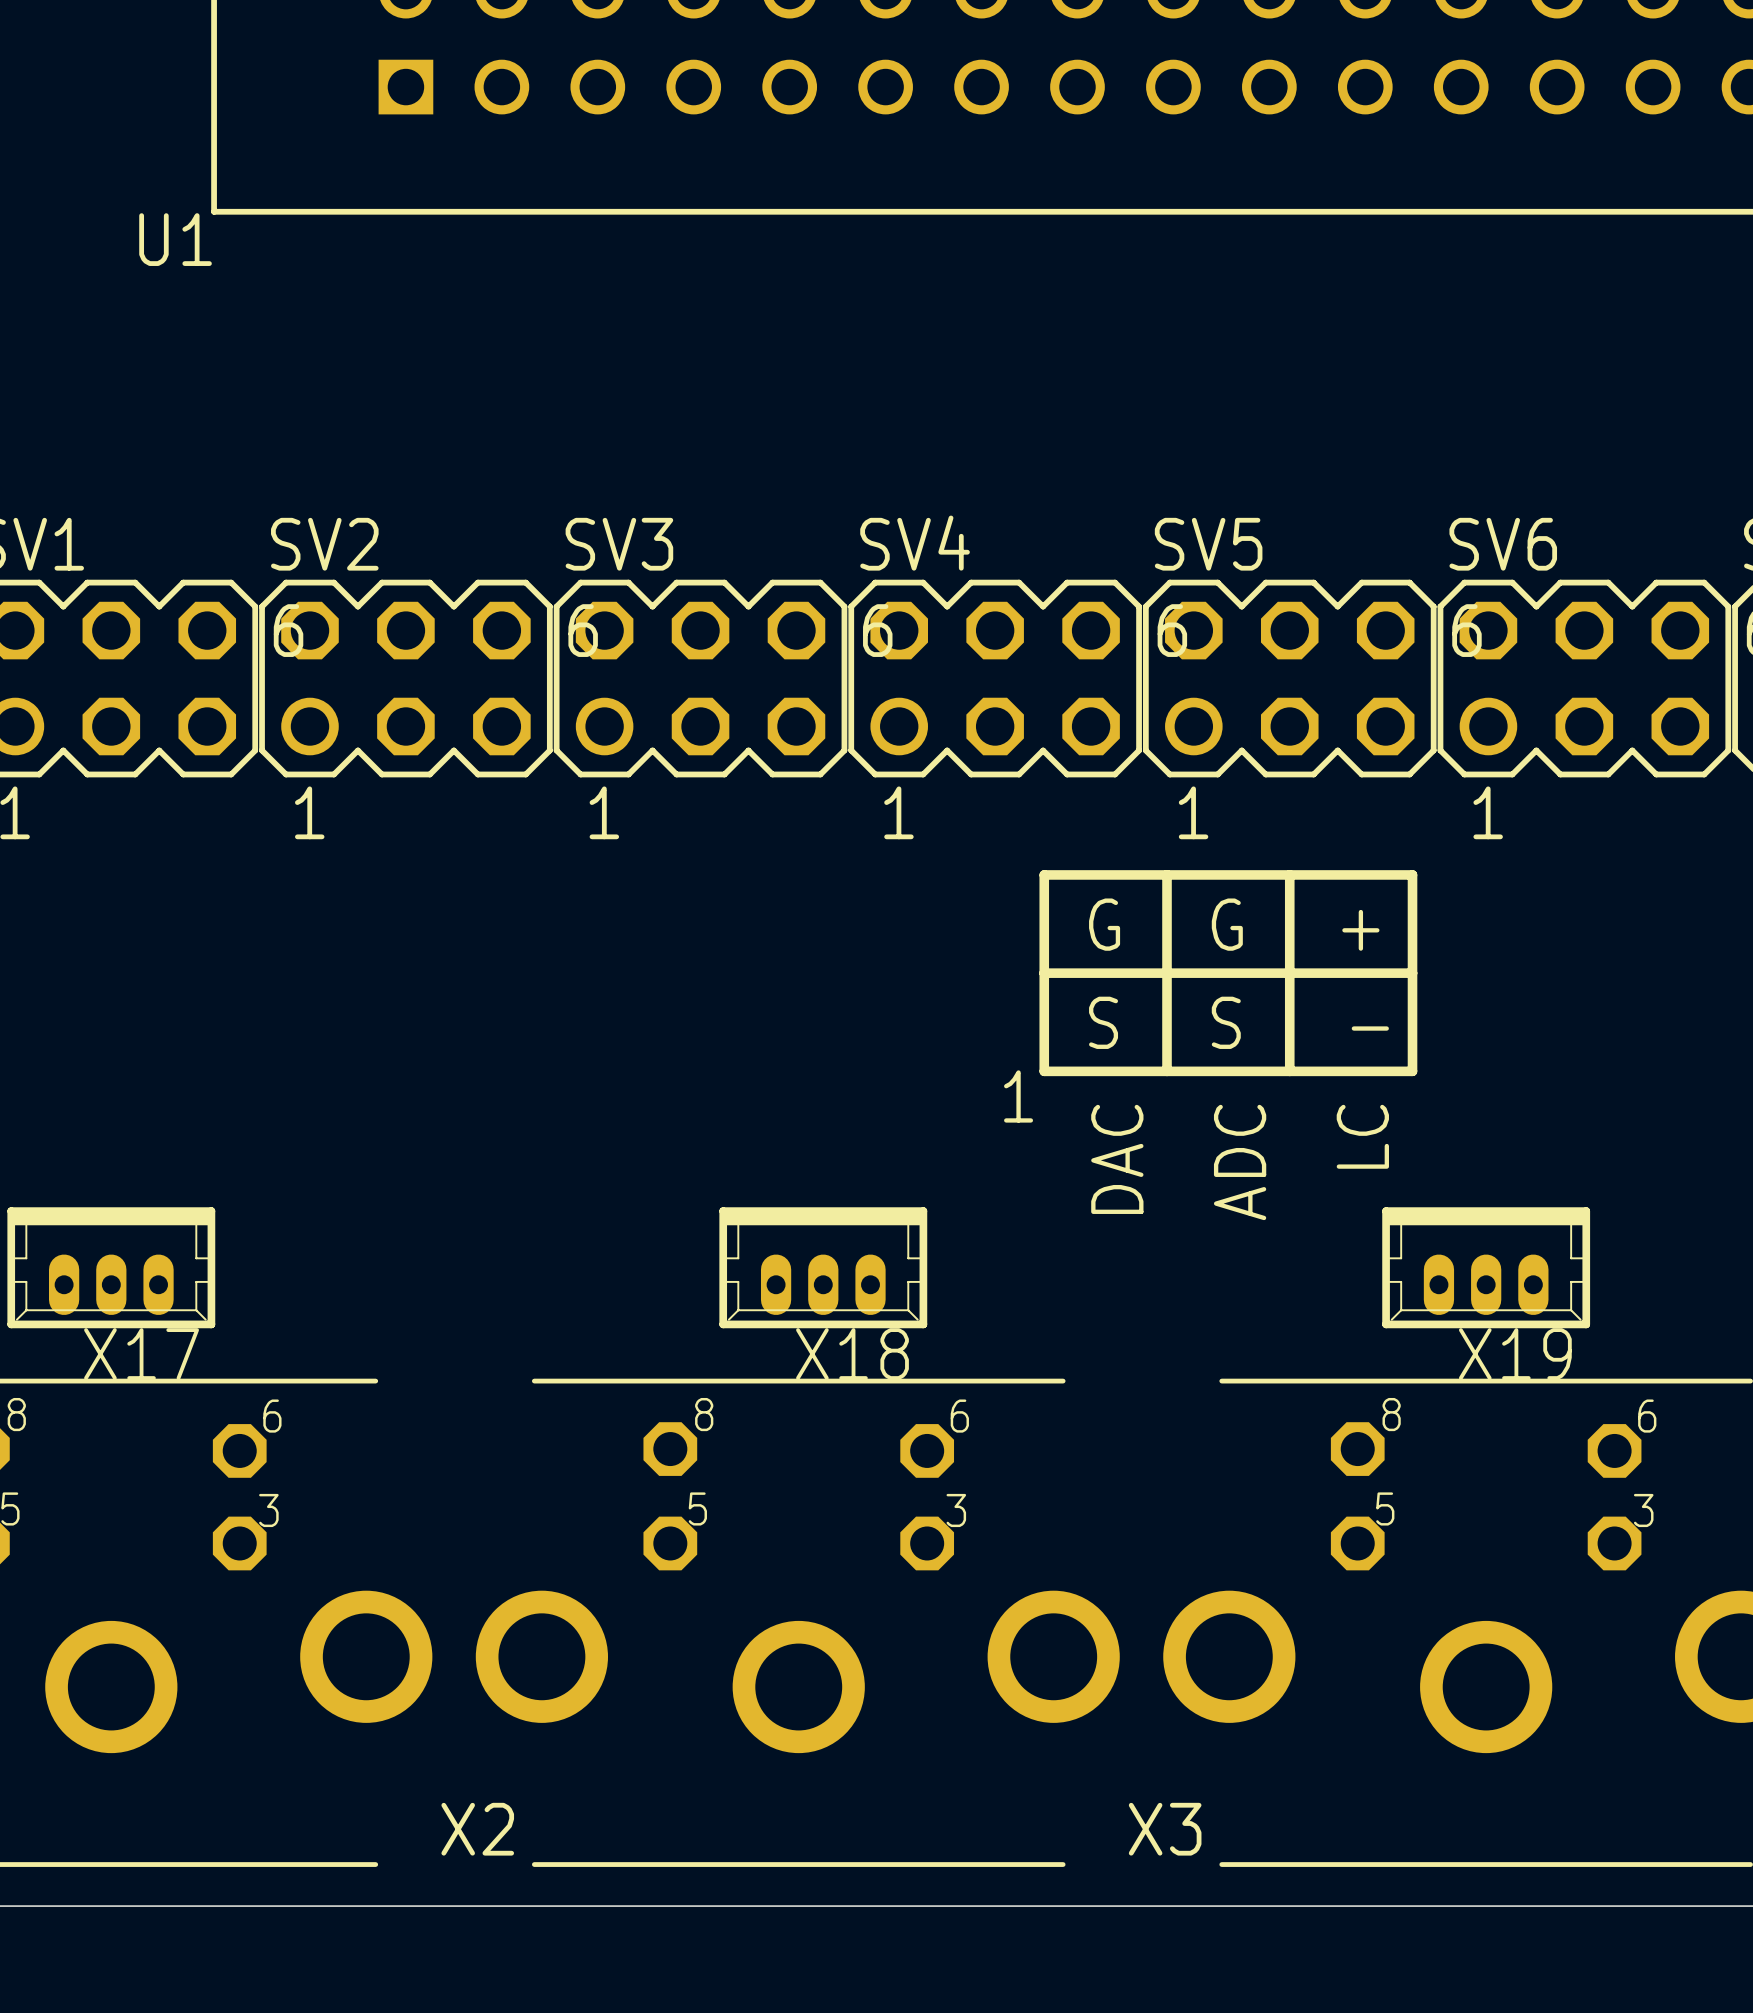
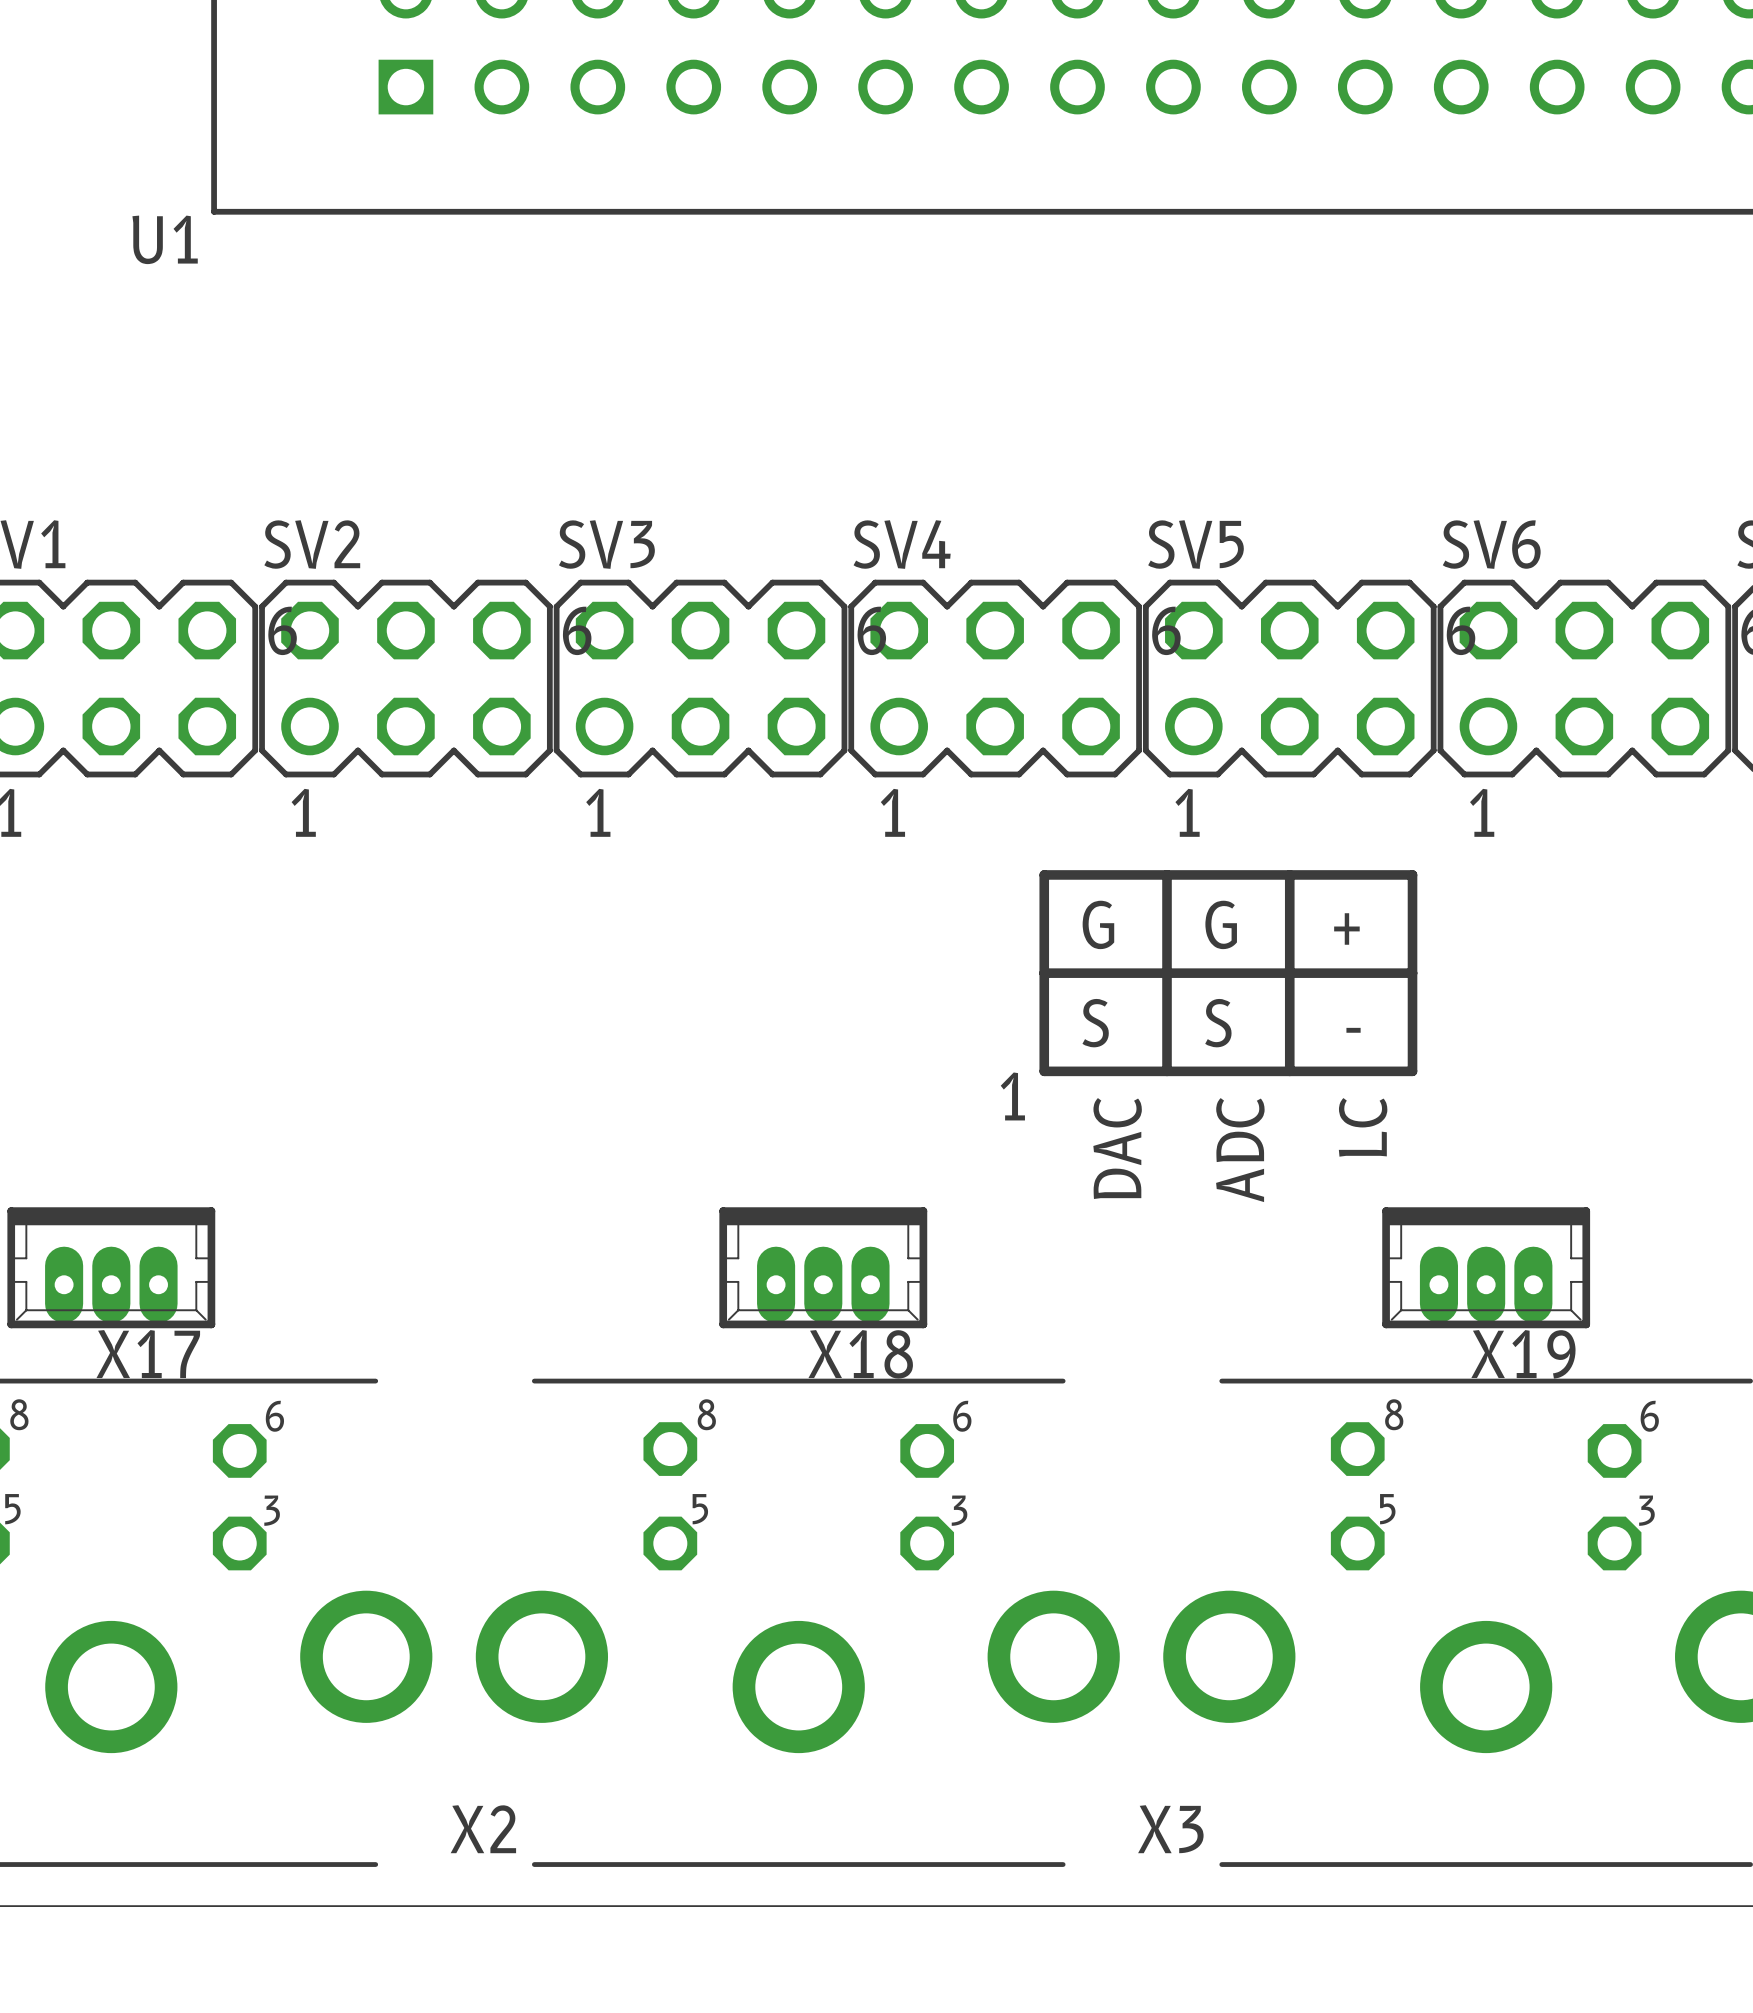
X17 footprint: [7, 1207, 216, 1329] -> [7, 1207, 216, 1329]
X18 footprint: [719, 1207, 928, 1329] -> [719, 1207, 928, 1329]
X19 footprint: [1382, 1207, 1591, 1329] -> [1382, 1207, 1591, 1329]

